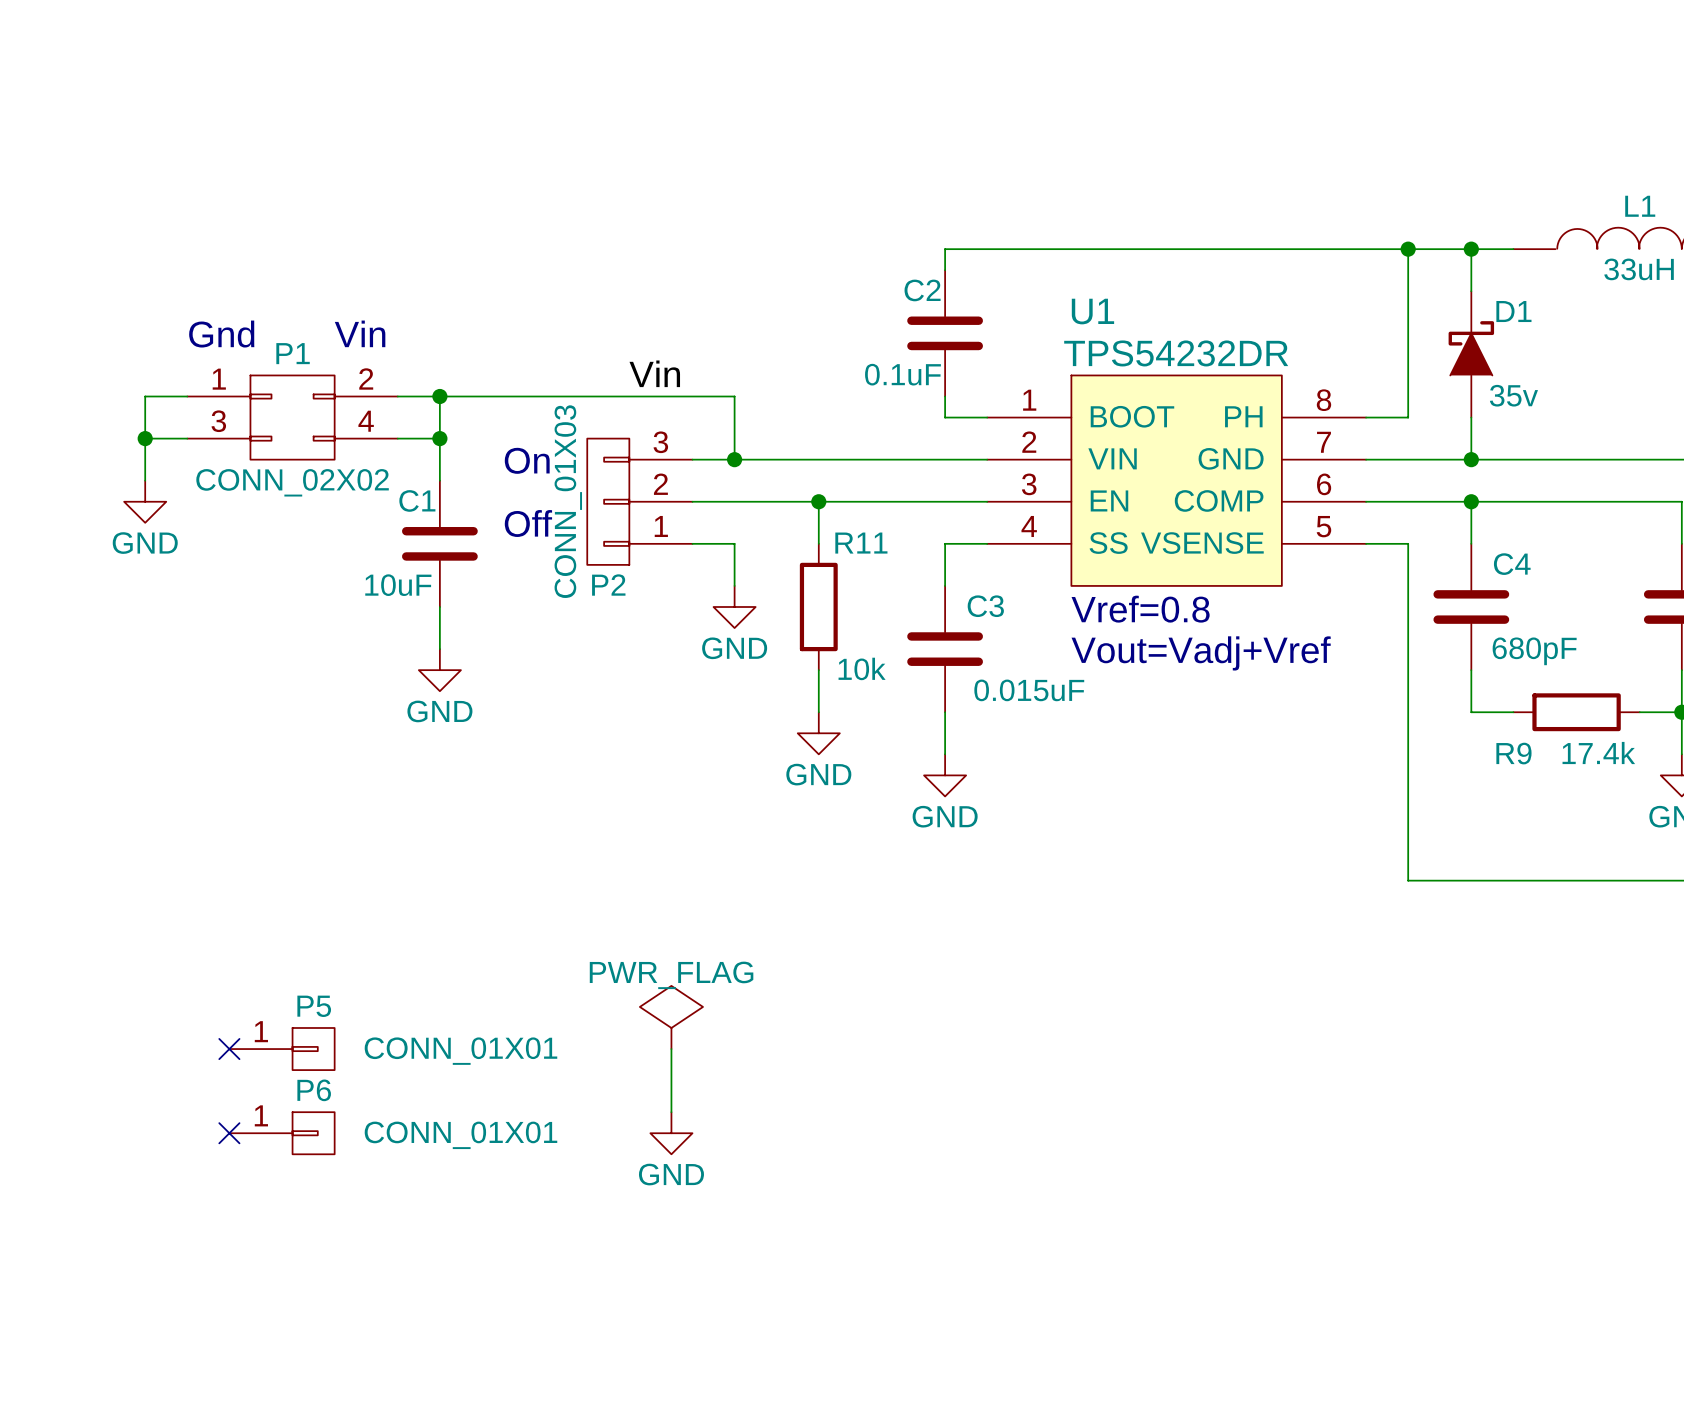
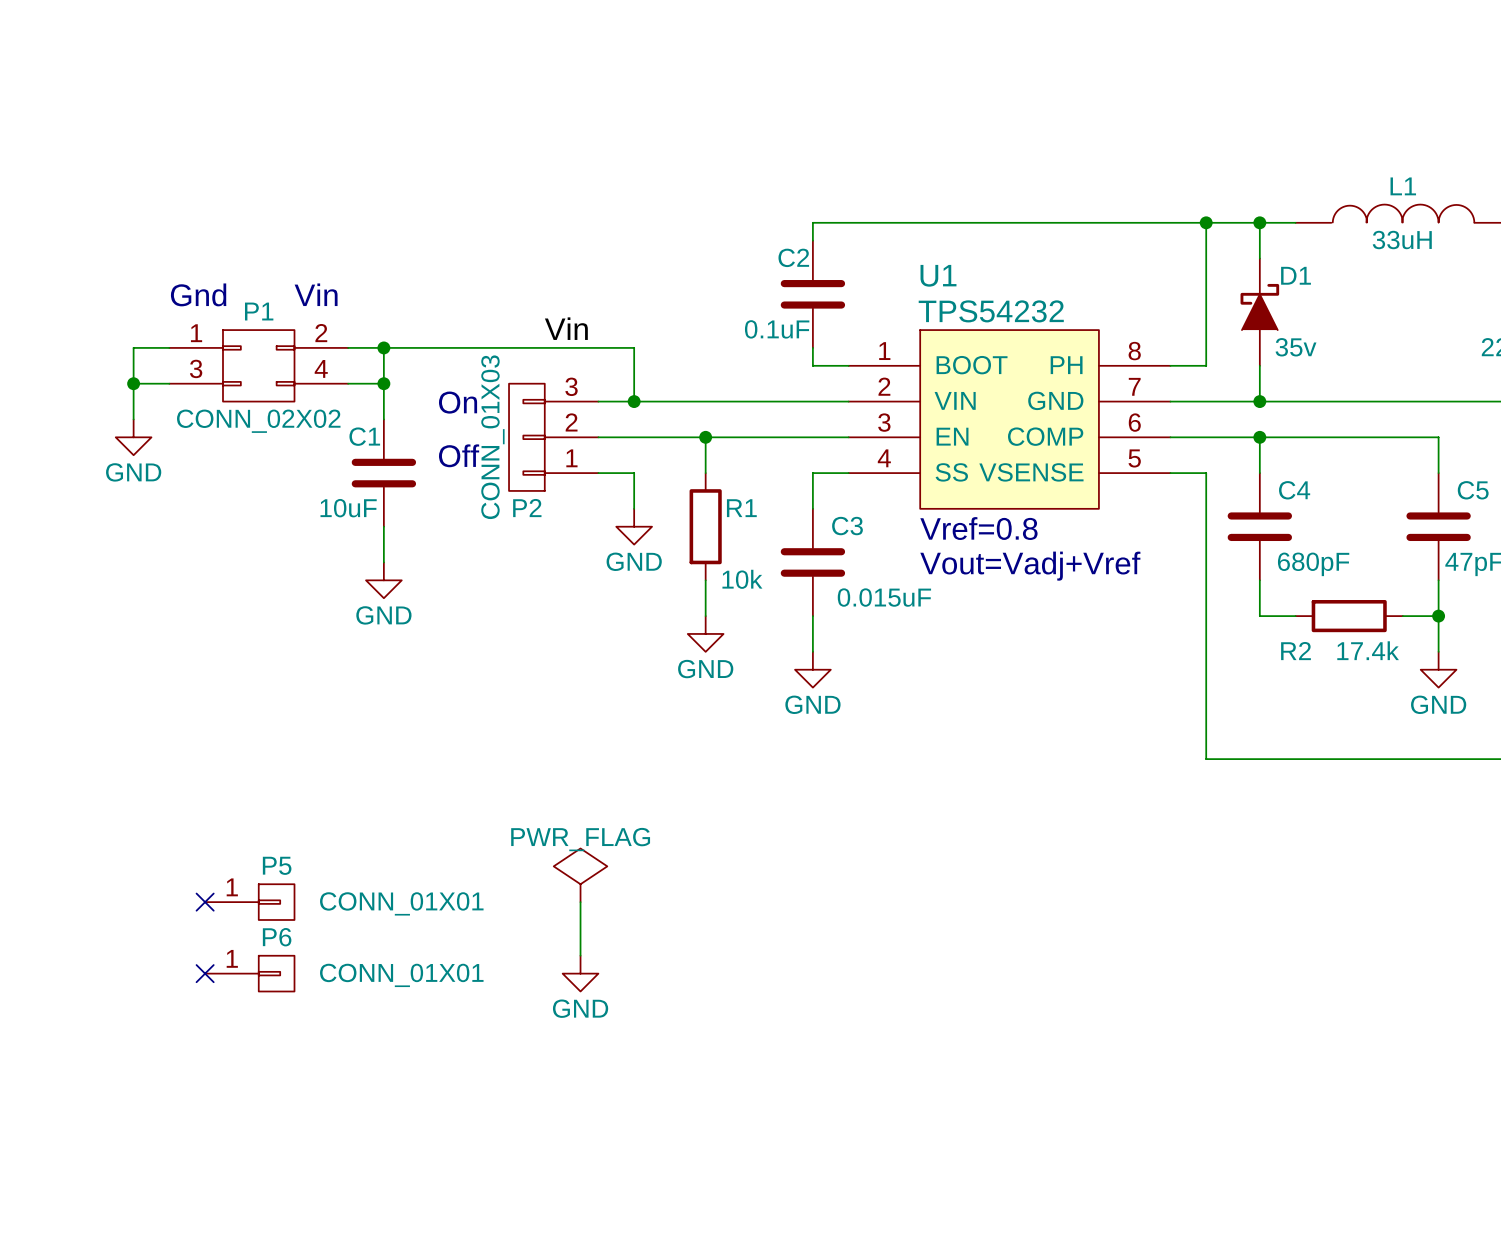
U1 value: TPS54232DR (1176, 353) -> TPS54232 (991, 311)
R11 name: R11 (861, 543) -> R1 (741, 508)
R9 name: R9 (1513, 753) -> R2 (1296, 651)

